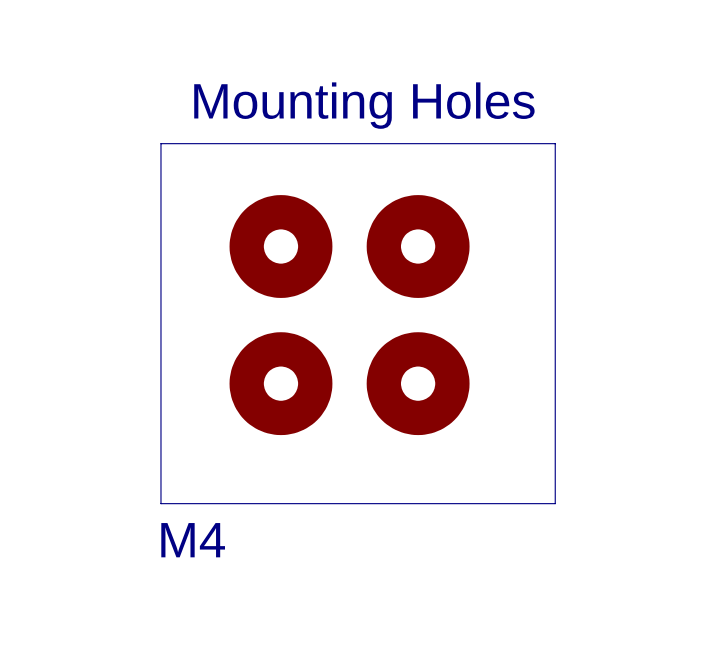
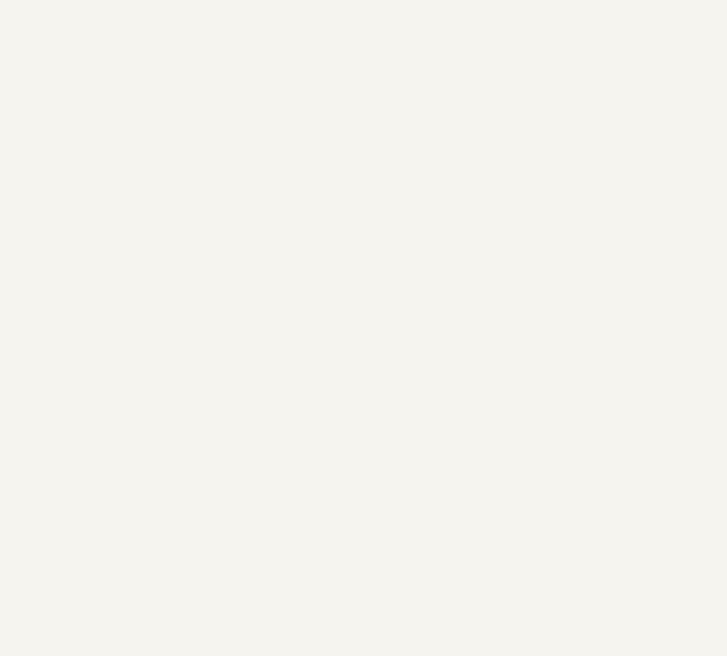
text: Mounting Holes (364, 105) -> none
line: (160, 143) (555, 143) (555, 503) (160, 503) (160, 143) -> none
part: (280, 246) -> none
part: (418, 246) -> none
part: (280, 383) -> none
part: (418, 383) -> none
text: M4 (193, 540) -> none

